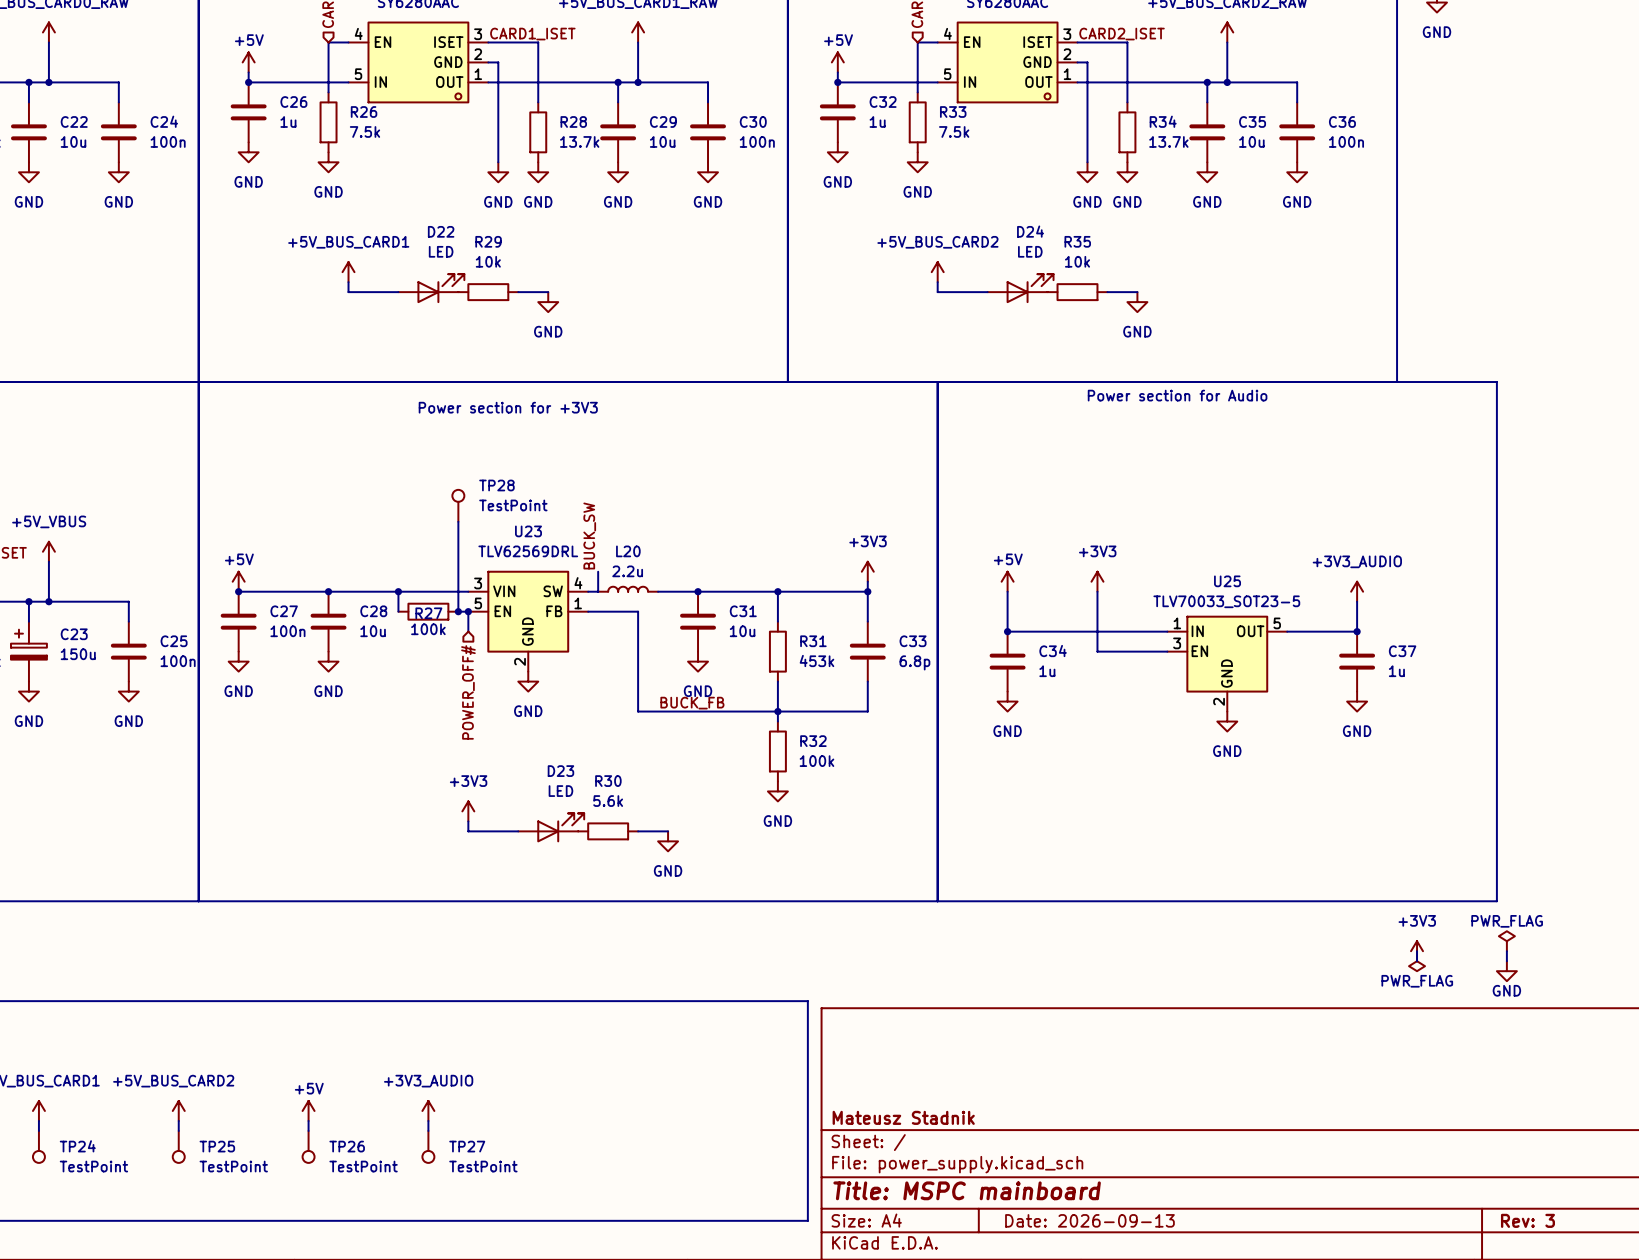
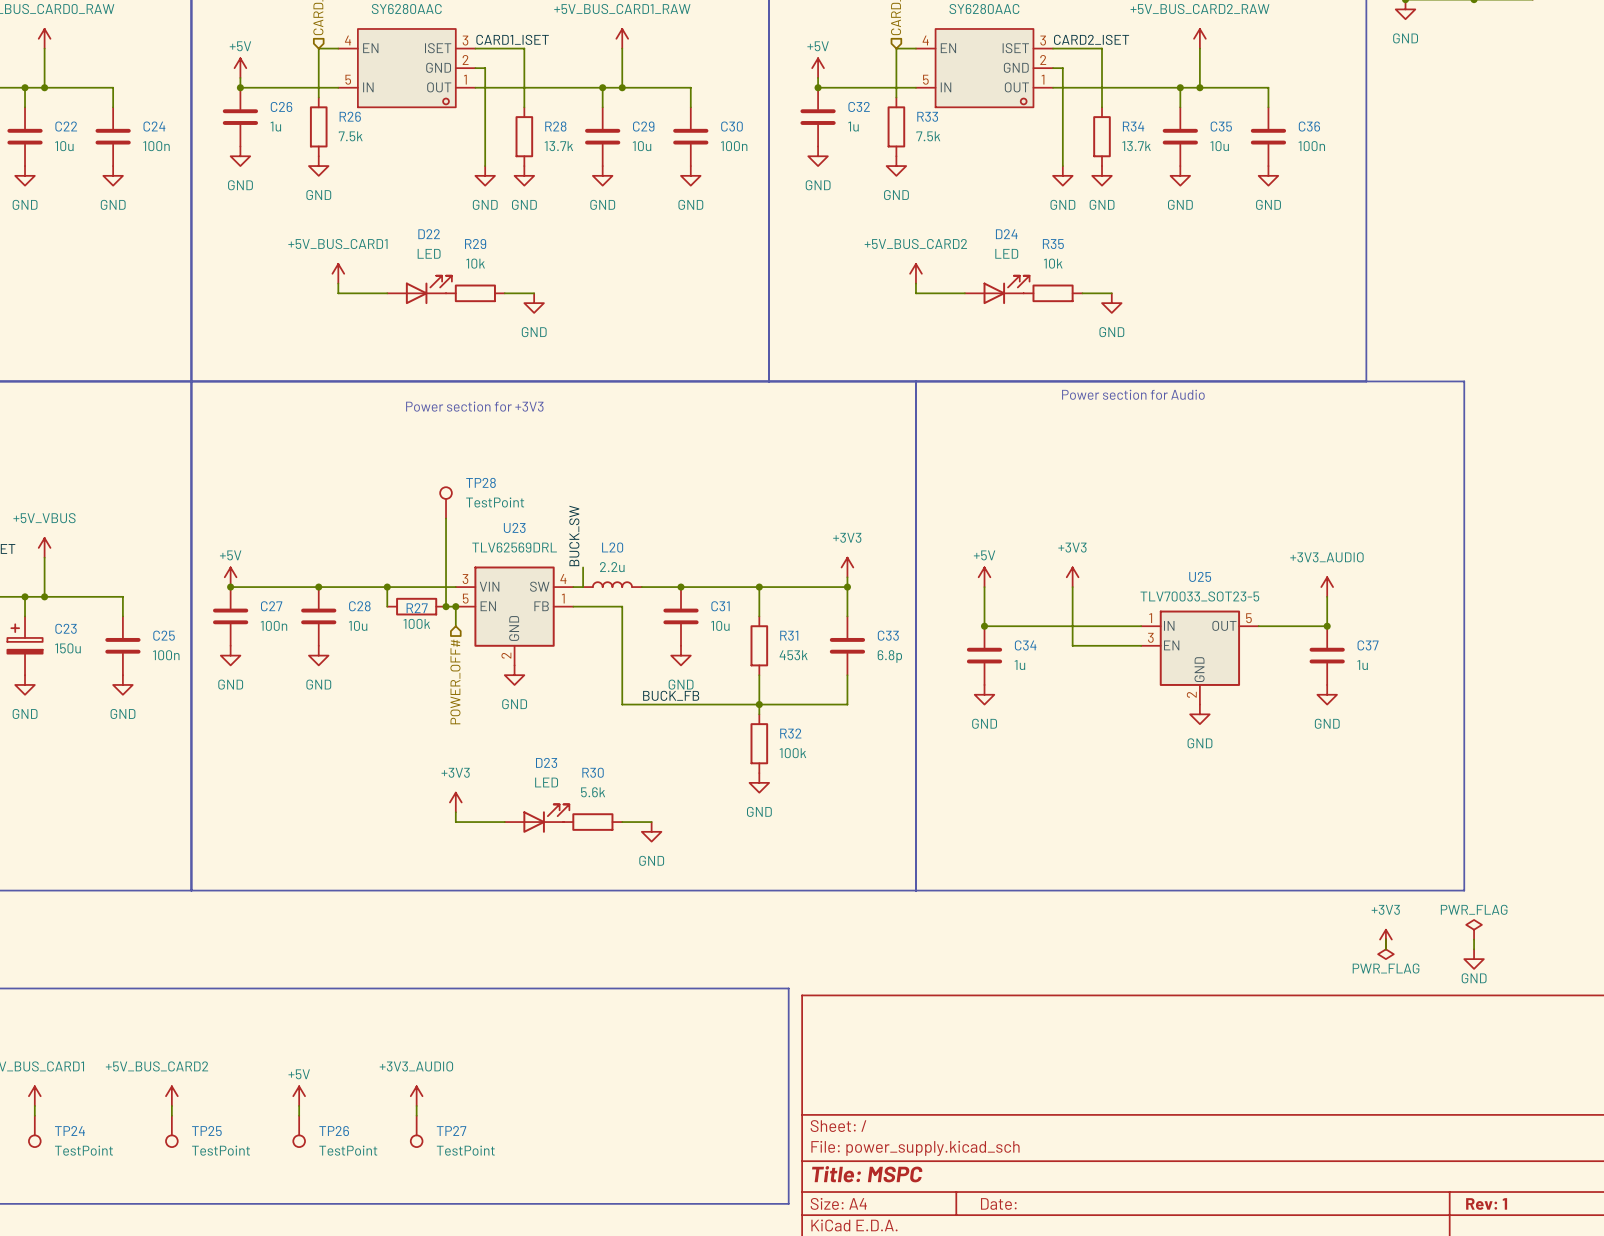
title block: Mateusz Stadnik (903, 1117) -> none
title block: Title: MSPC mainboard (967, 1190) -> Title: MSPC (867, 1174)
title block: Date: 2026-09-13 (1089, 1220) -> Date: (998, 1203)
title block: Rev: 3 (1527, 1220) -> Rev: 1 (1486, 1203)

